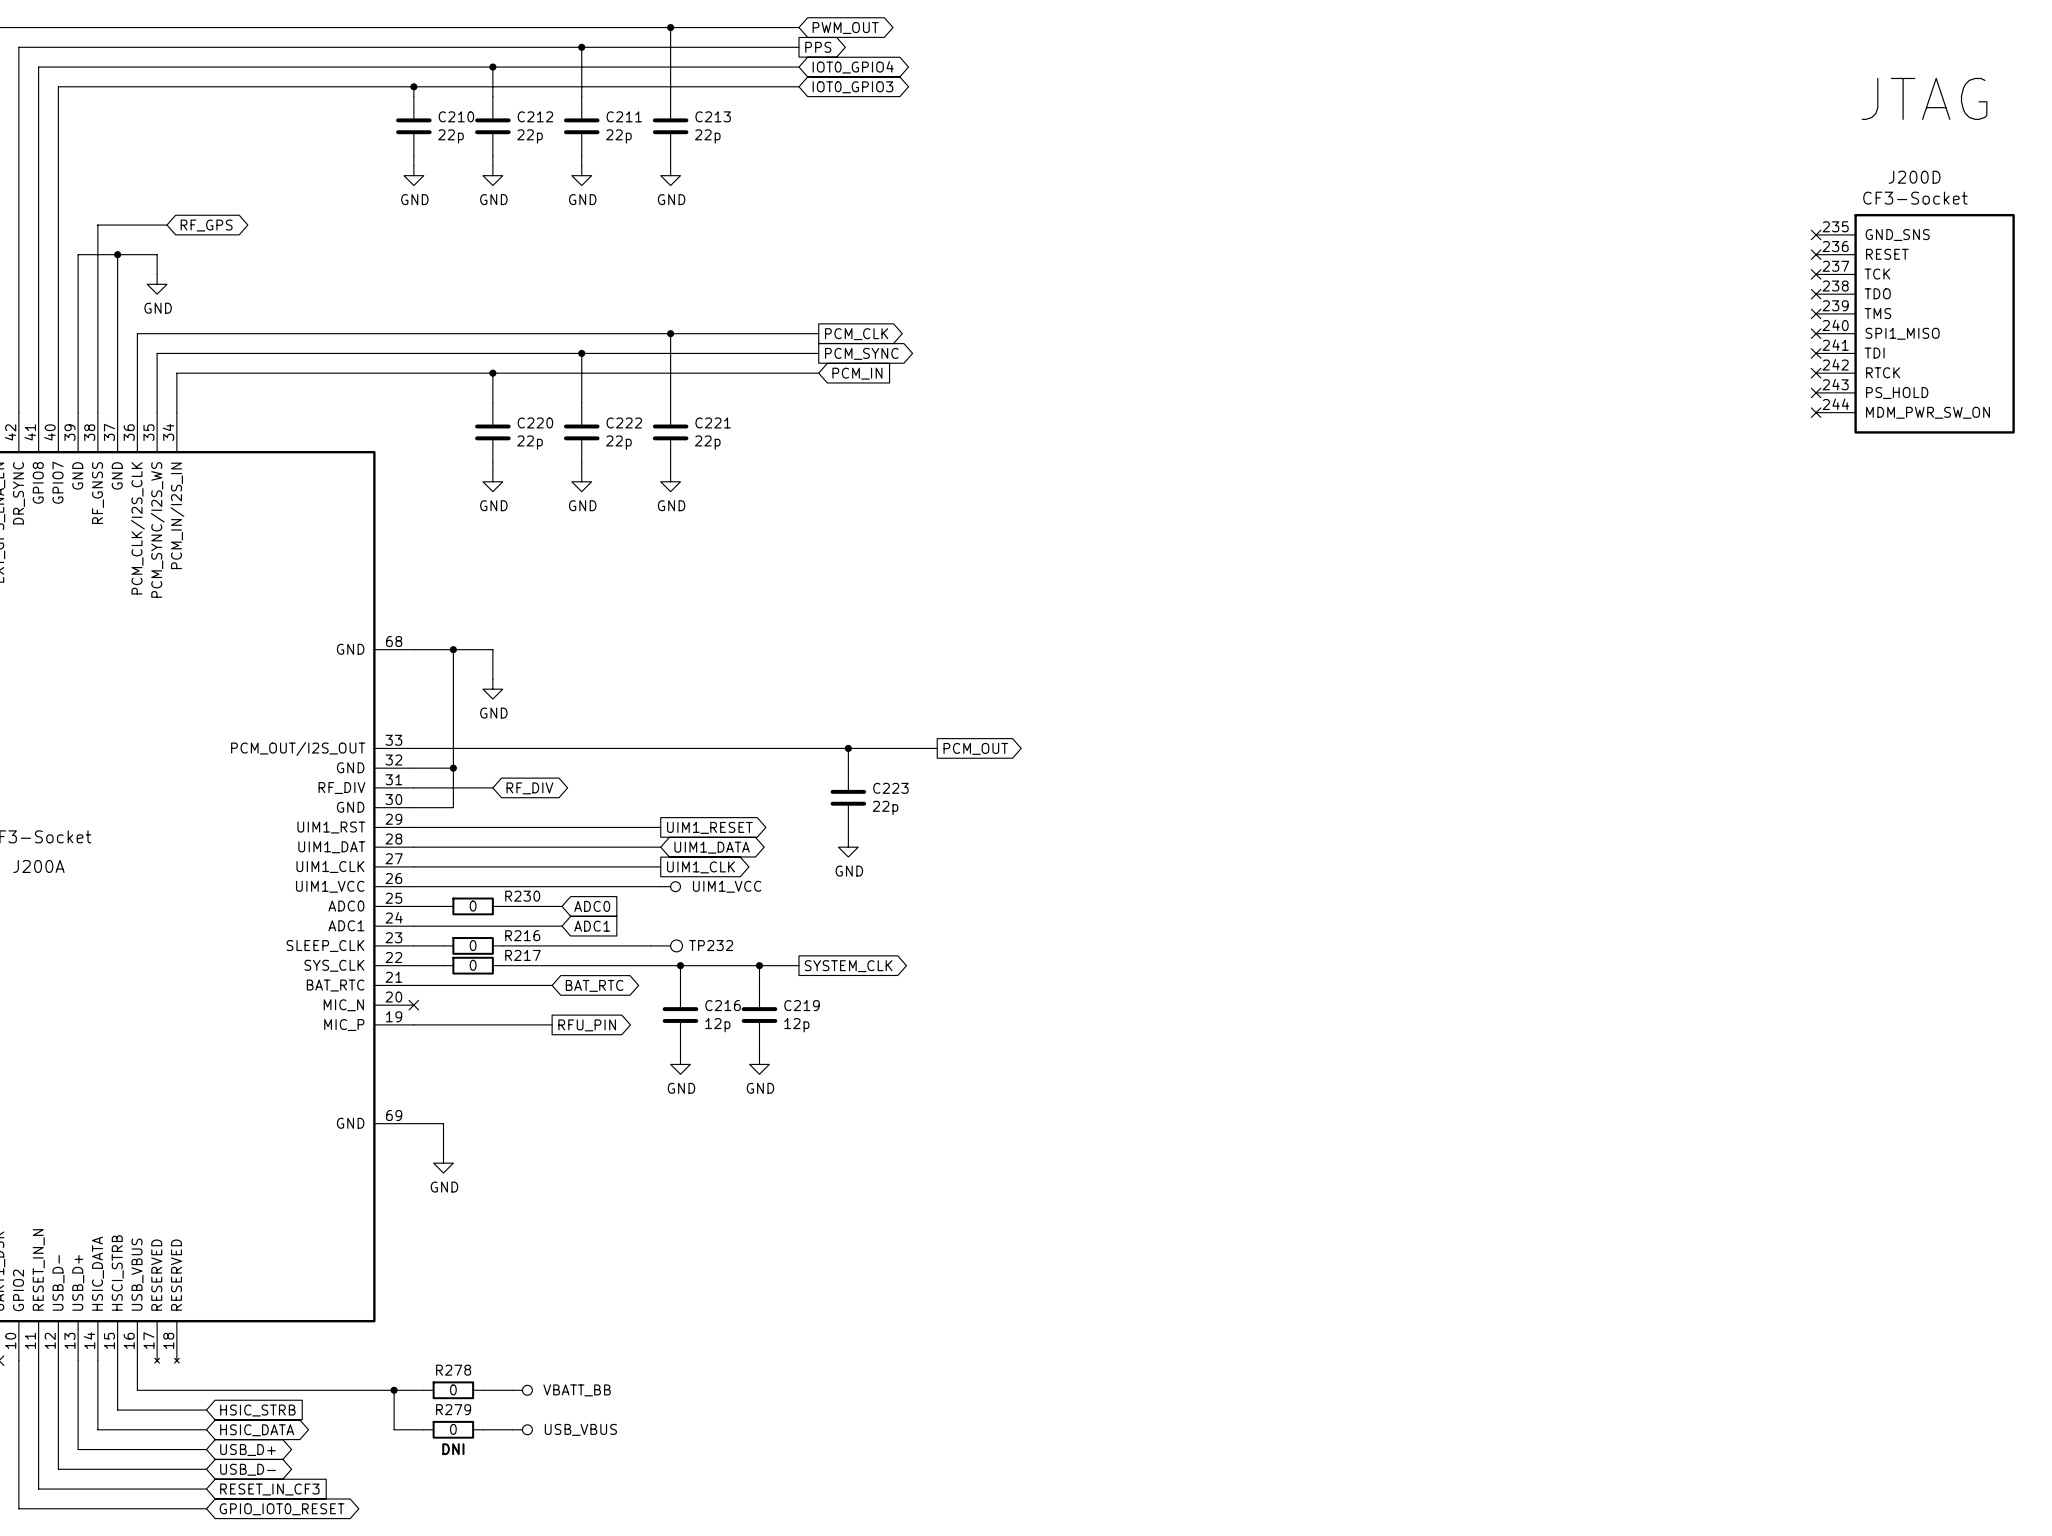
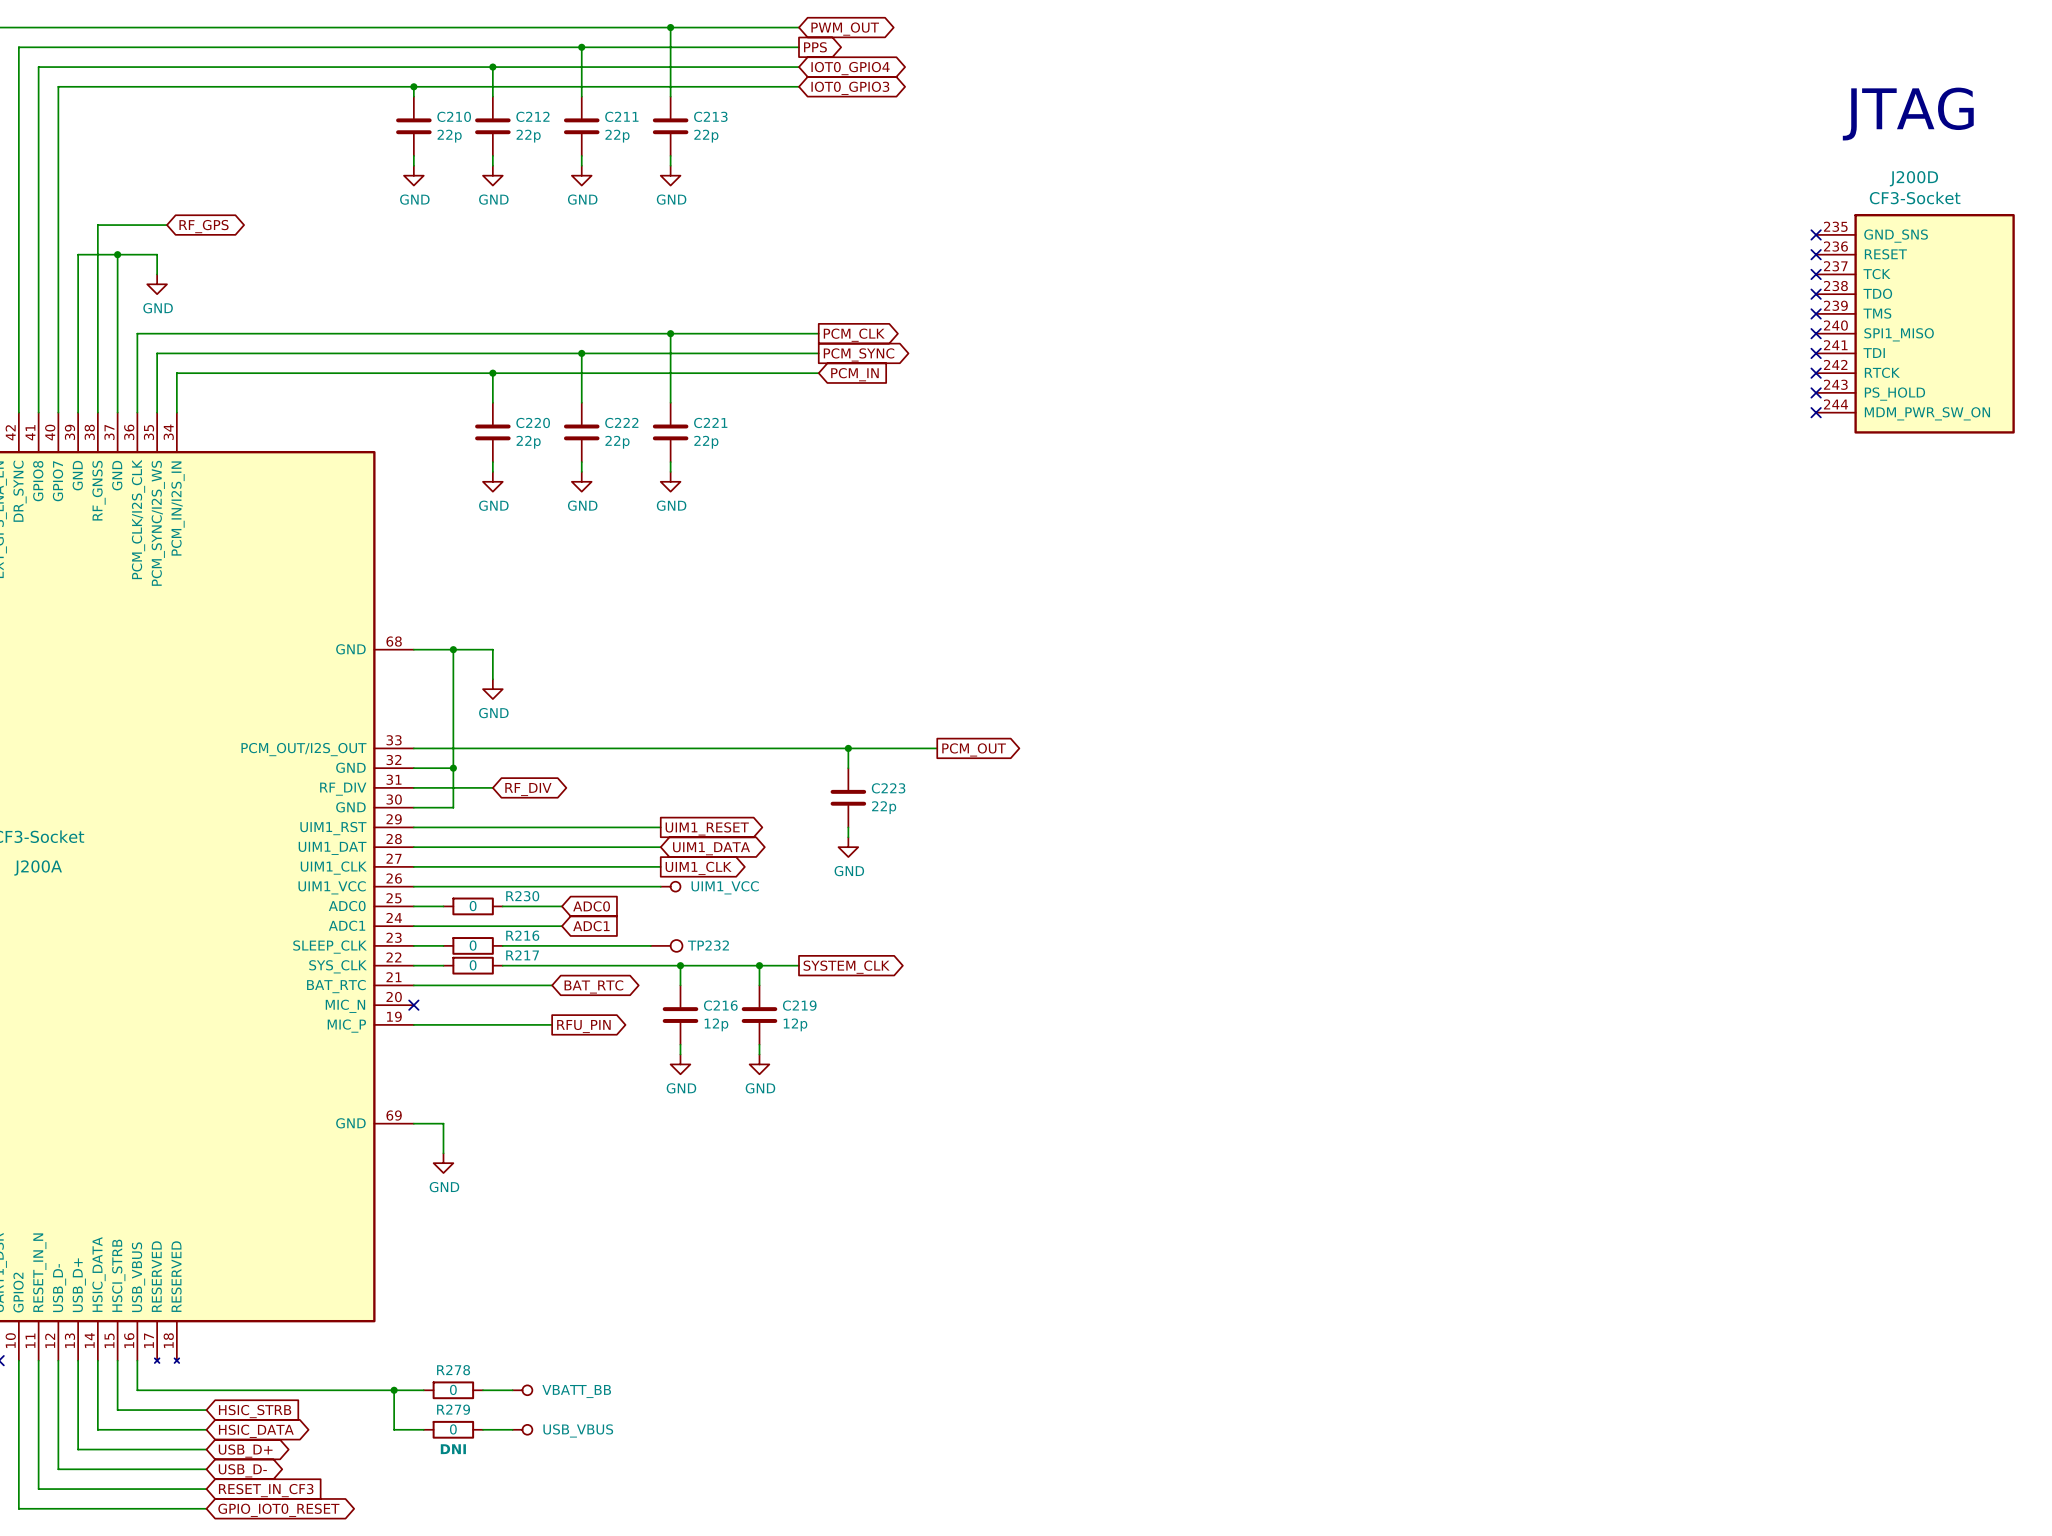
text position: JTAG (1924, 98) -> JTAG (1908, 114)

